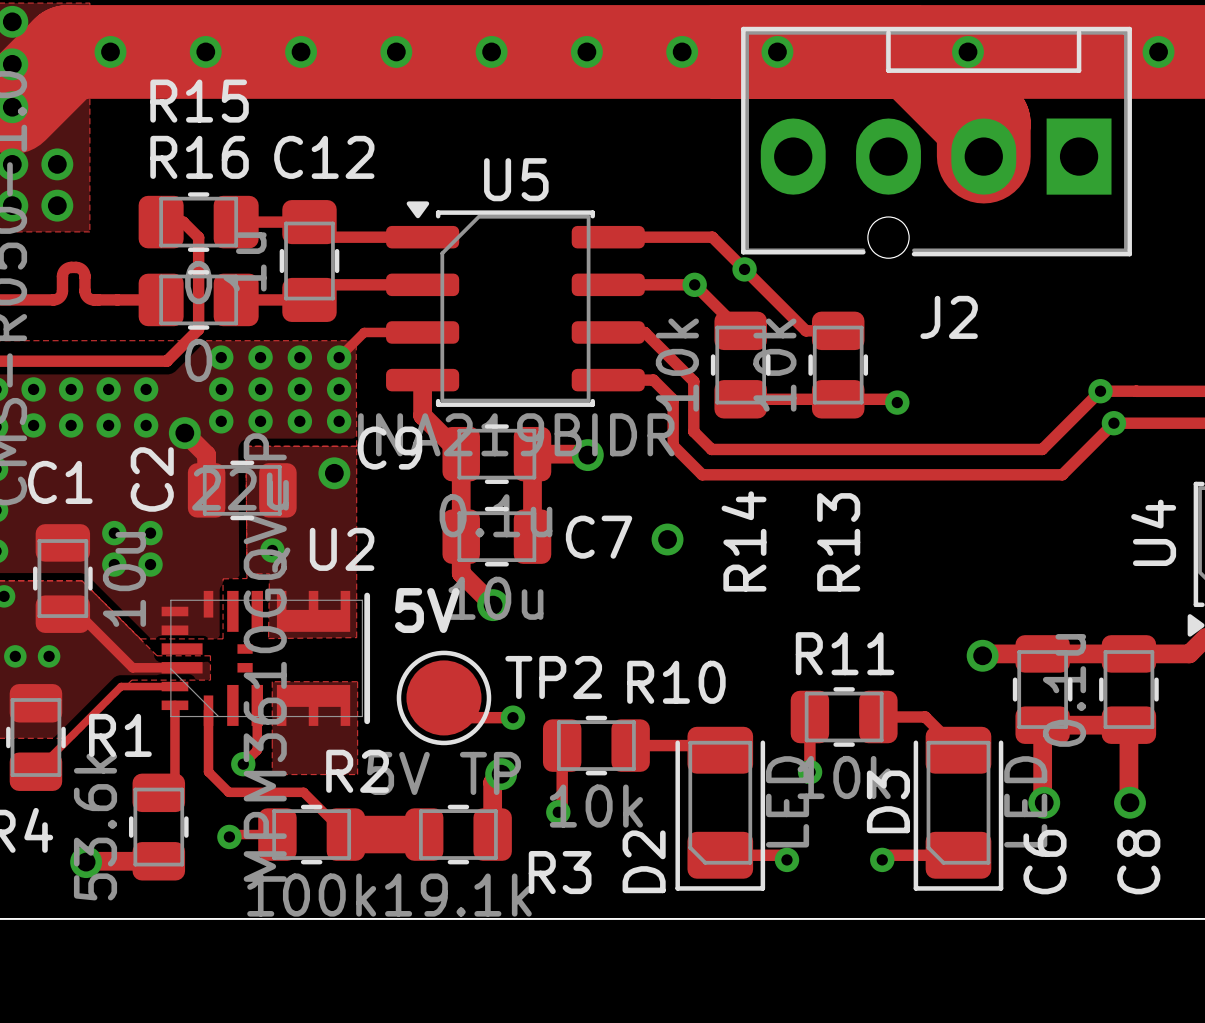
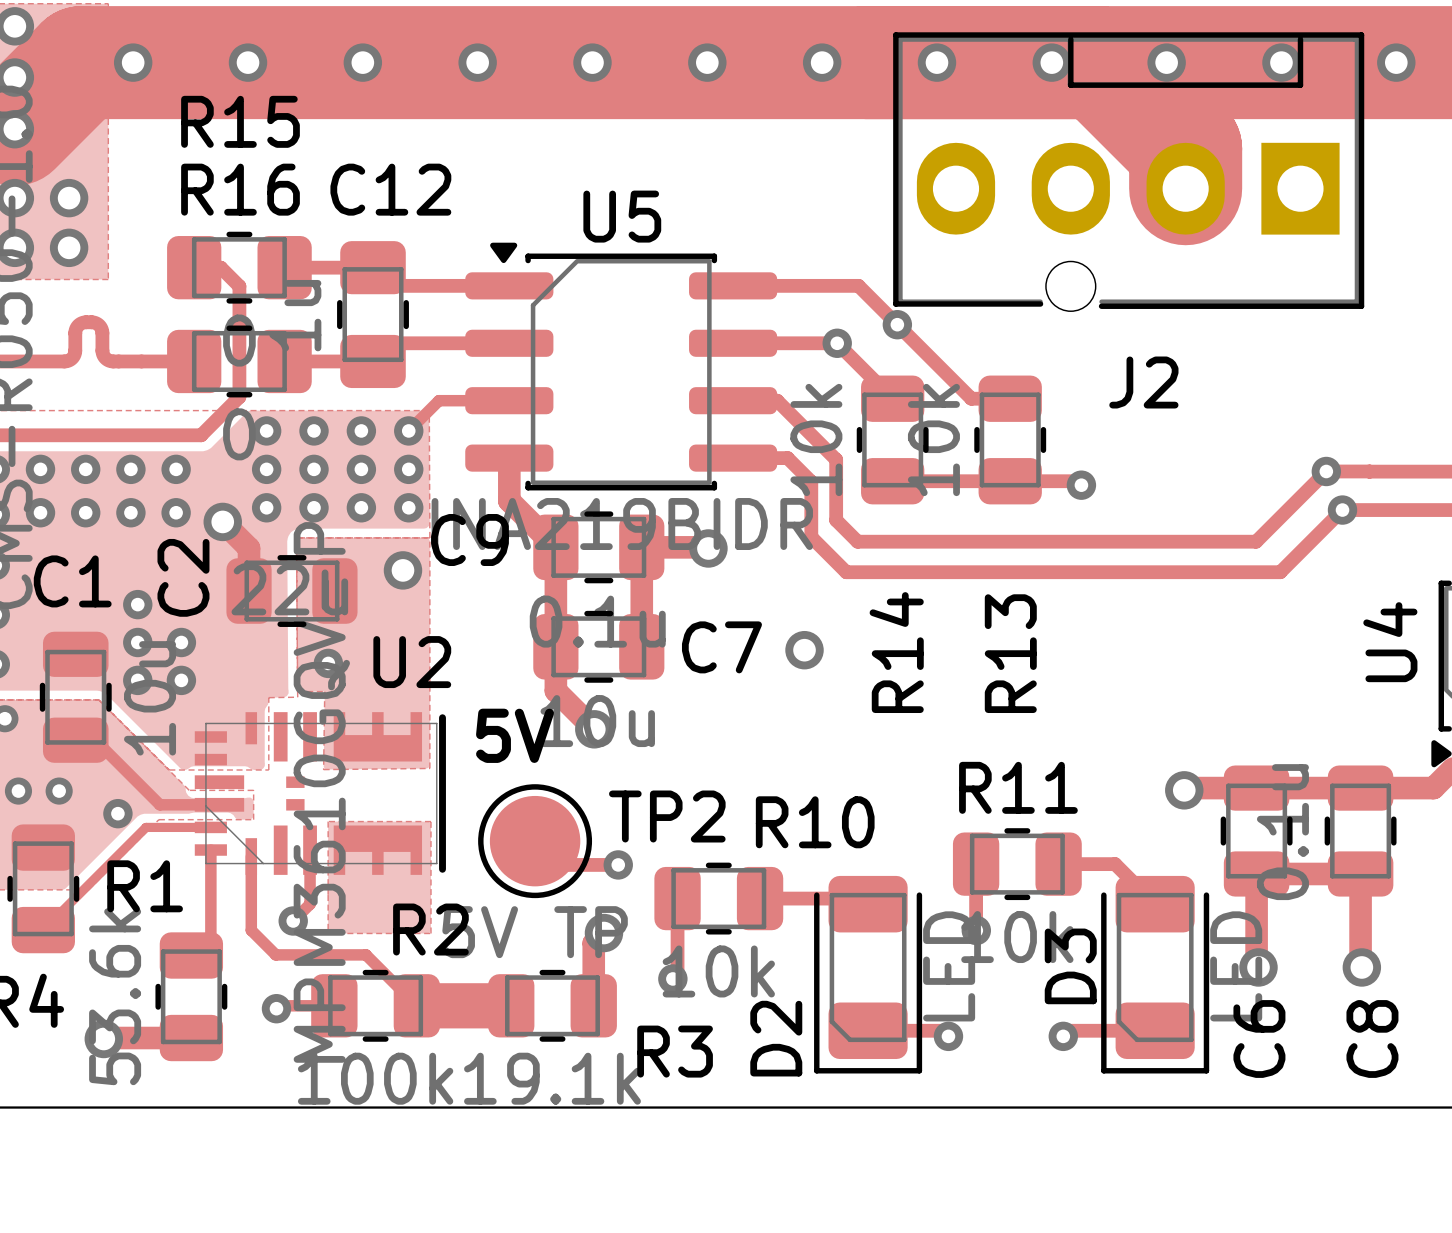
via: none -> (1051, 62)
via: none -> (1281, 62)
via: none -> (137, 604)
via: none -> (117, 813)

